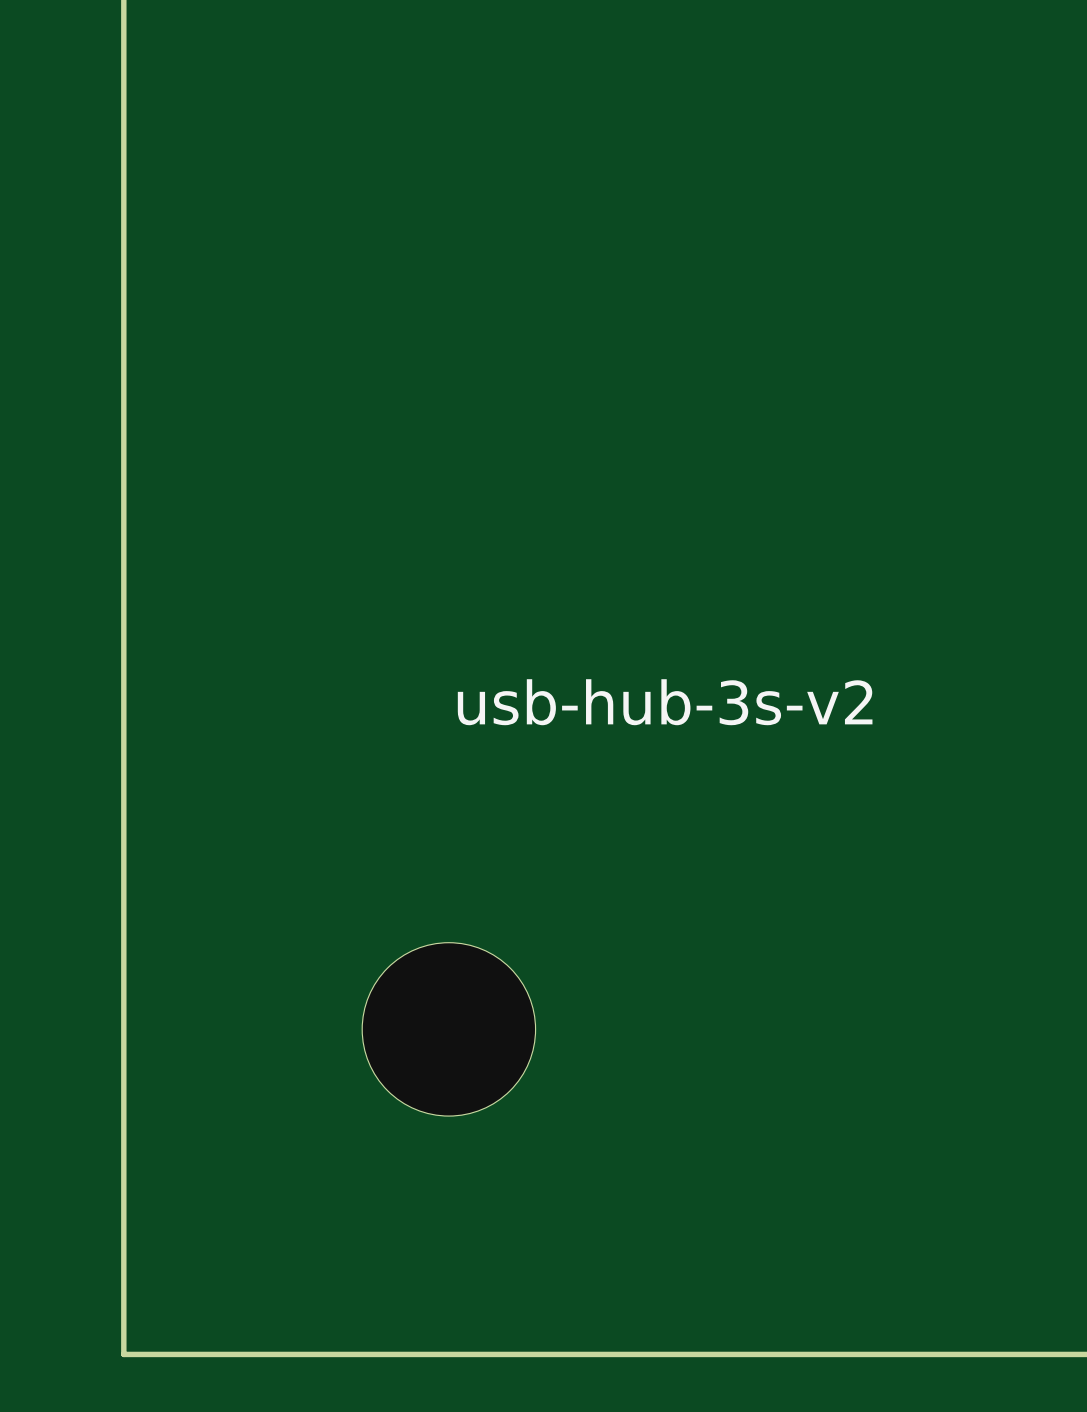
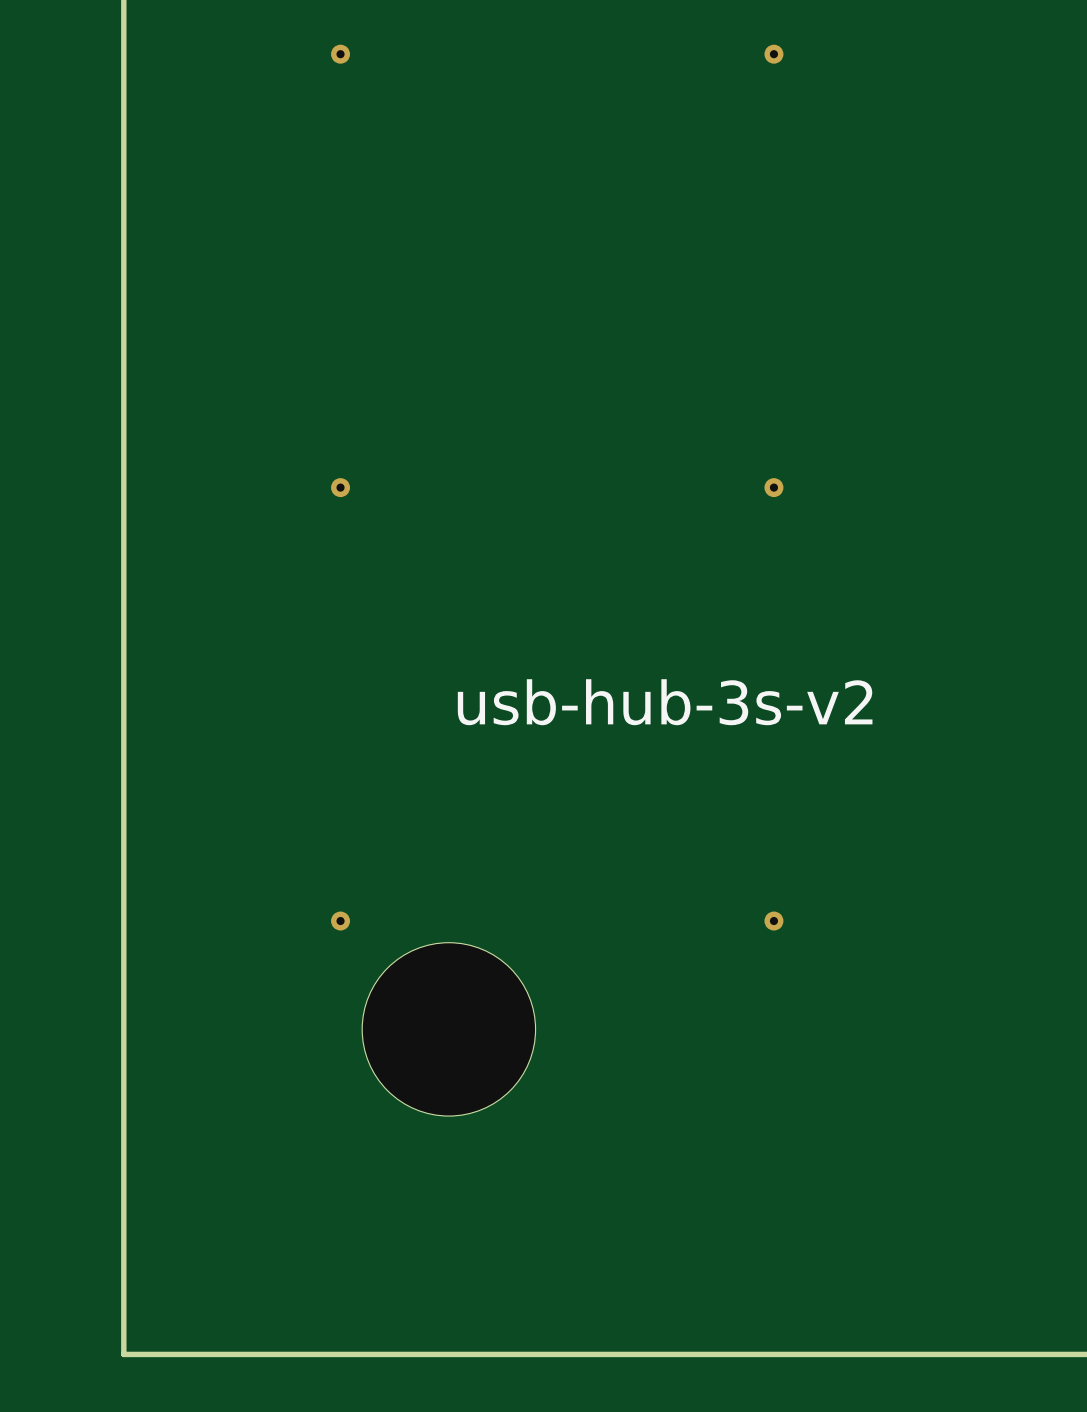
via: none -> (340, 54)
via: none -> (773, 54)
via: none -> (340, 487)
via: none -> (773, 487)
via: none -> (340, 921)
via: none -> (773, 921)

